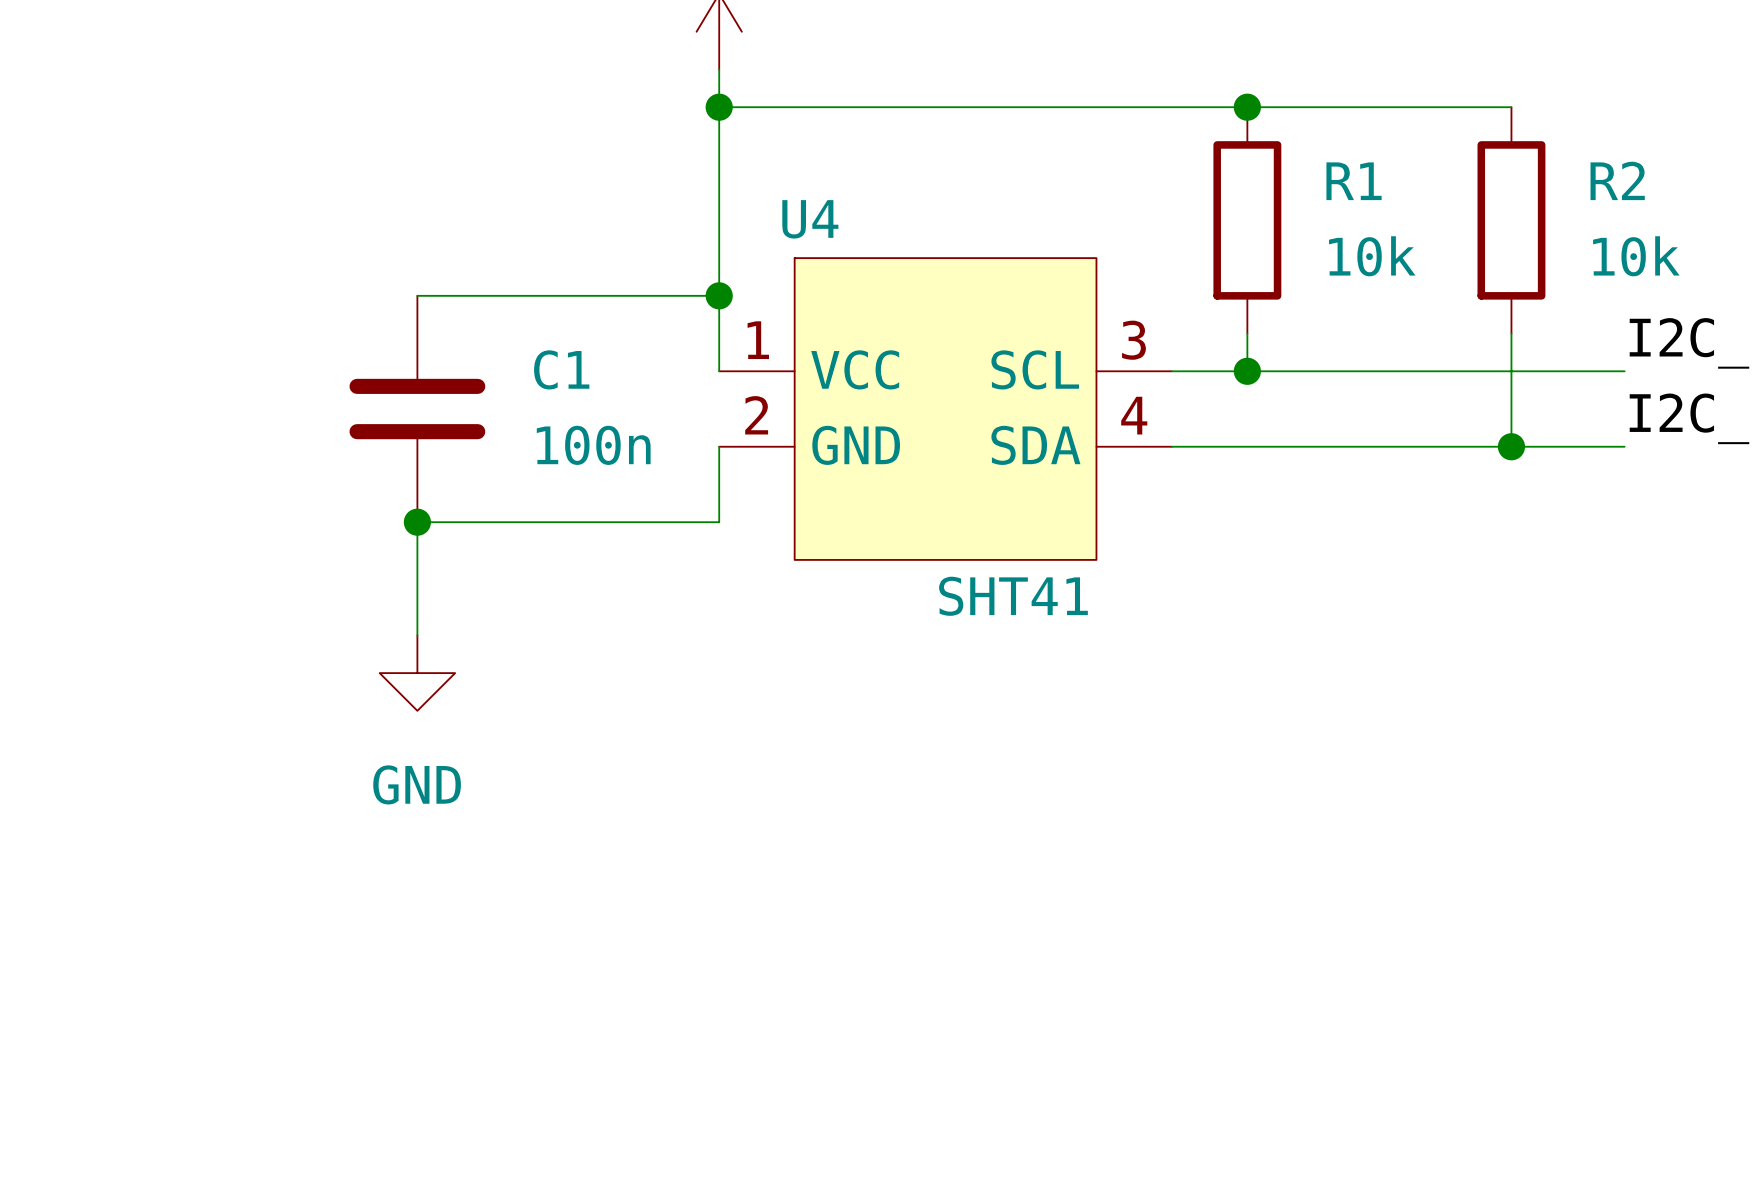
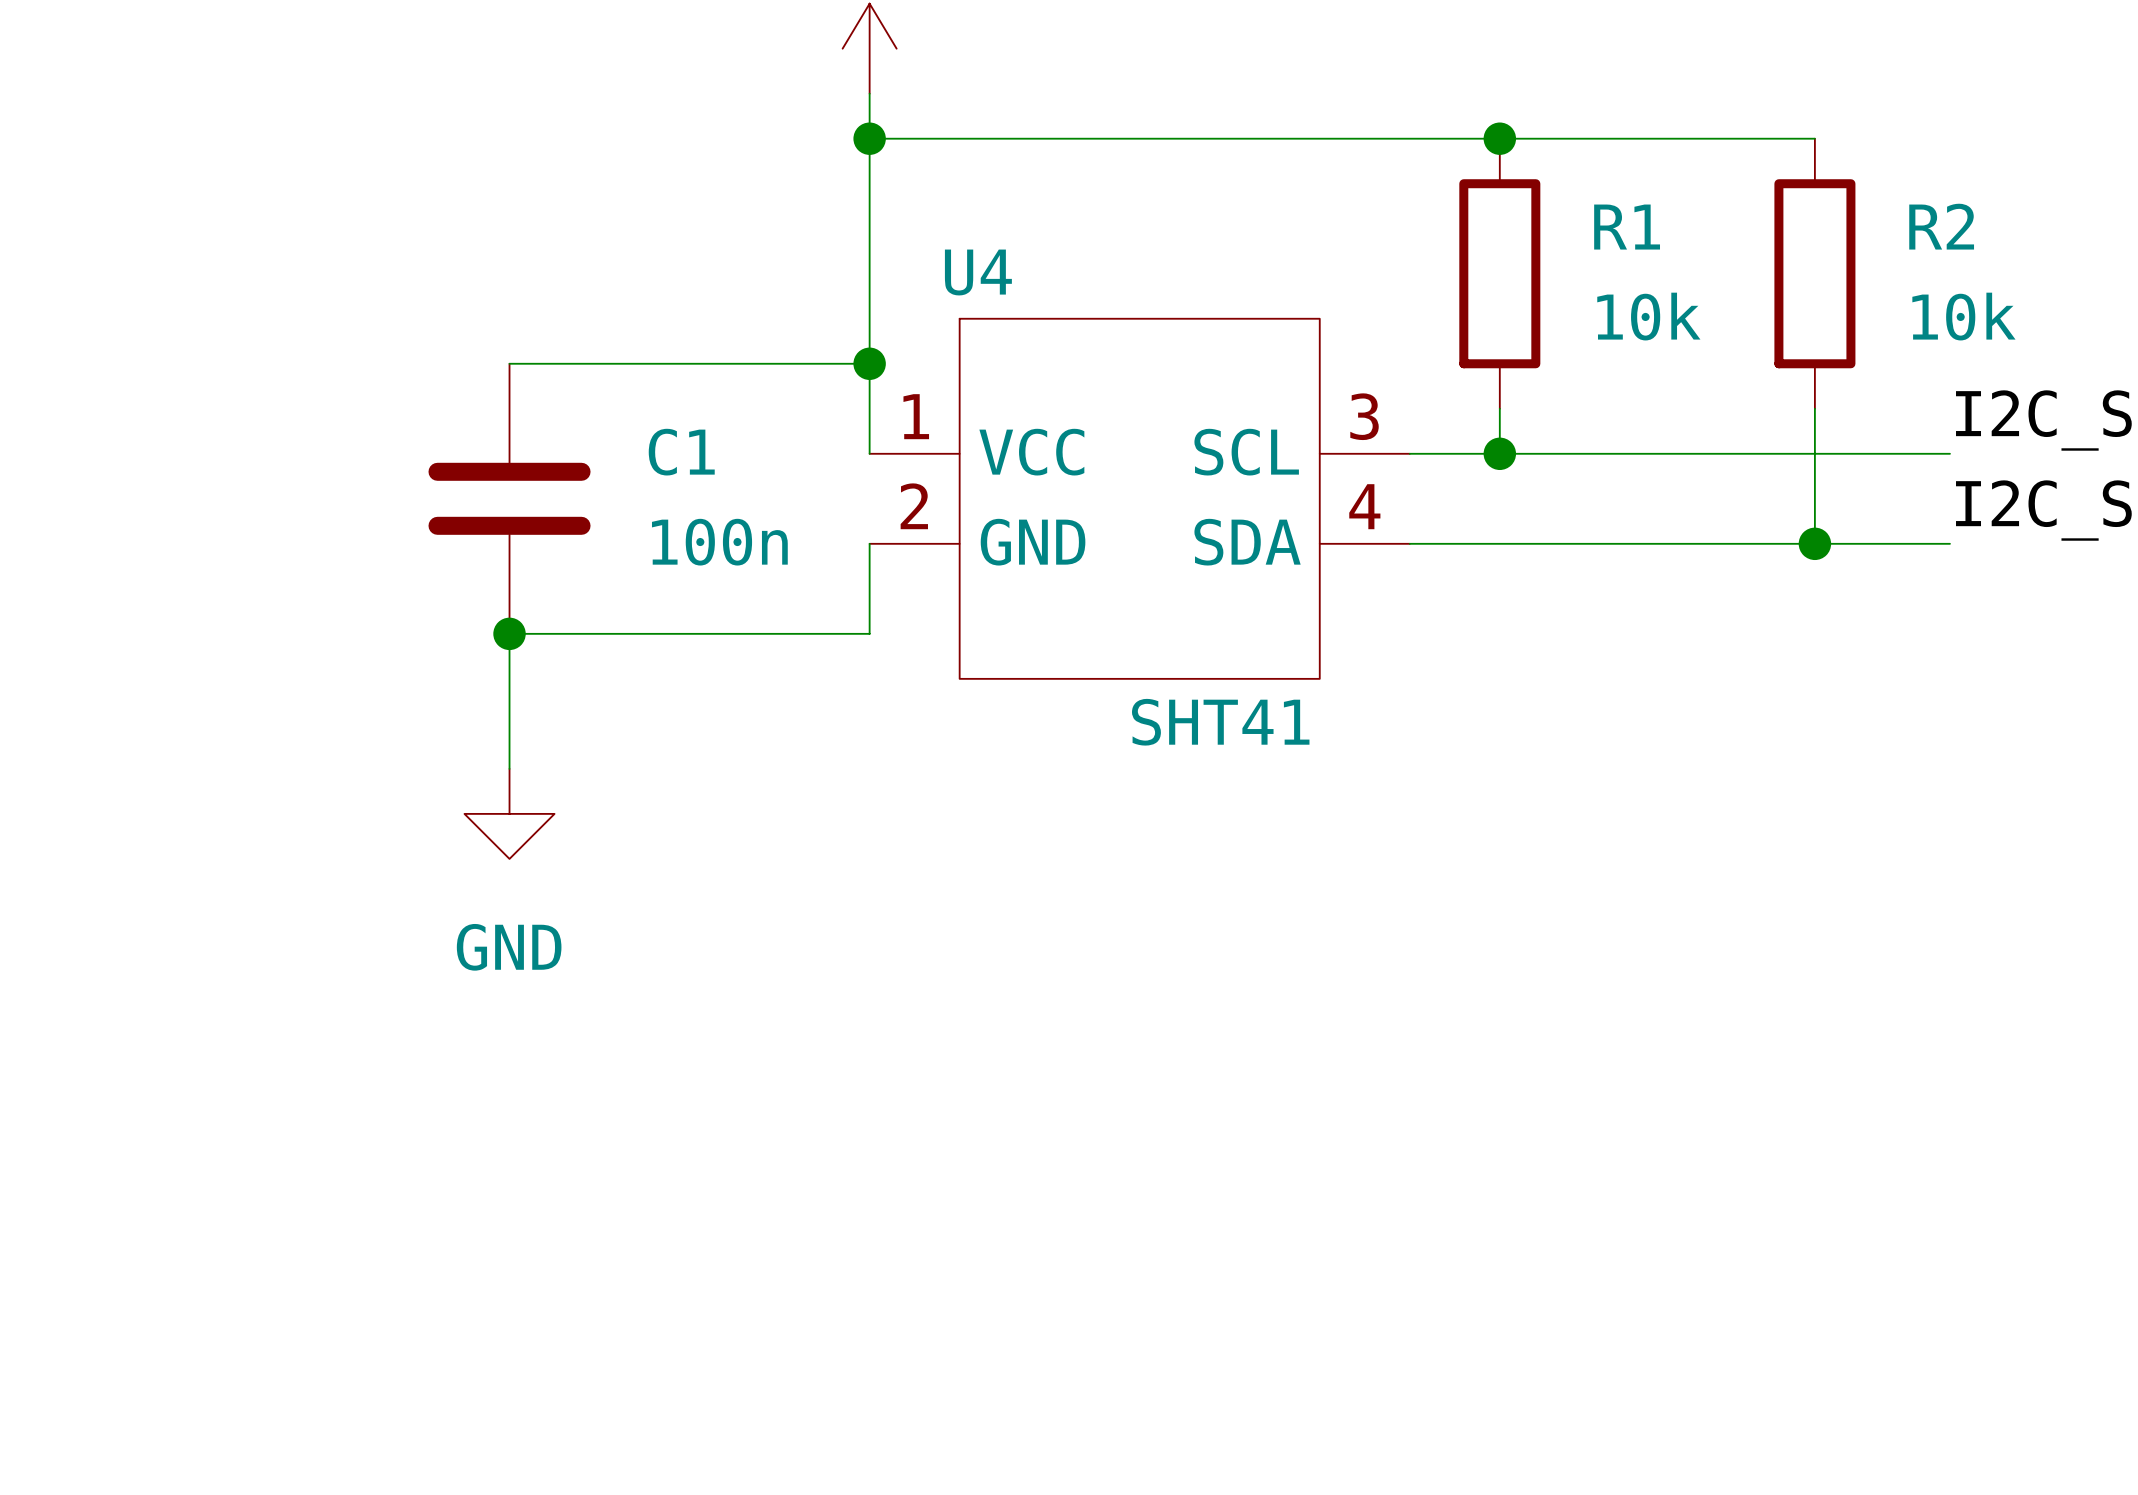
U4 symbol: [719, 258, 1172, 560] -> [869, 318, 1410, 679]

